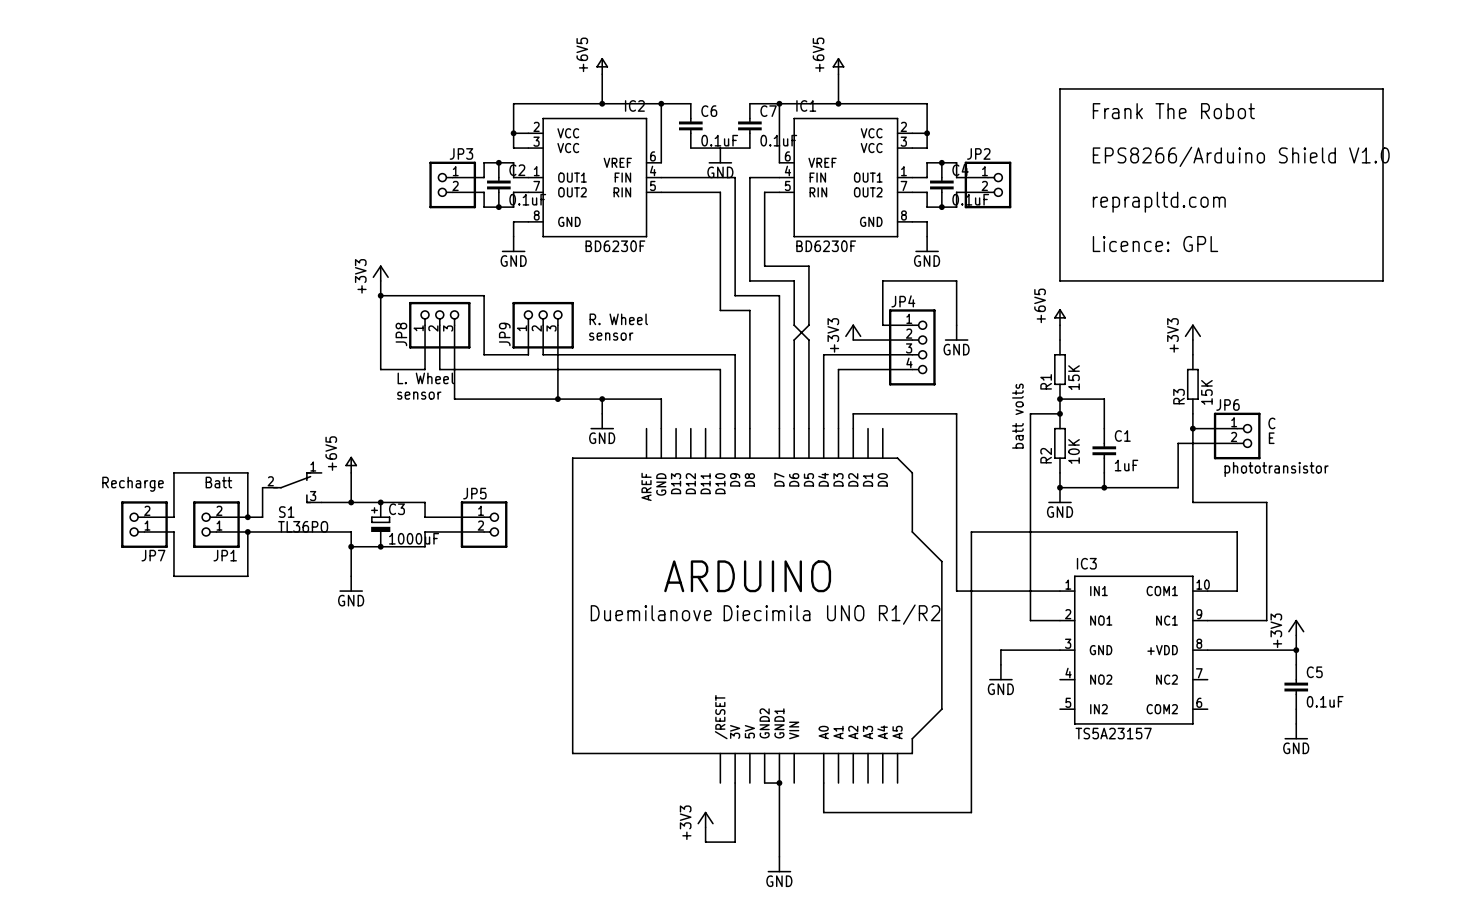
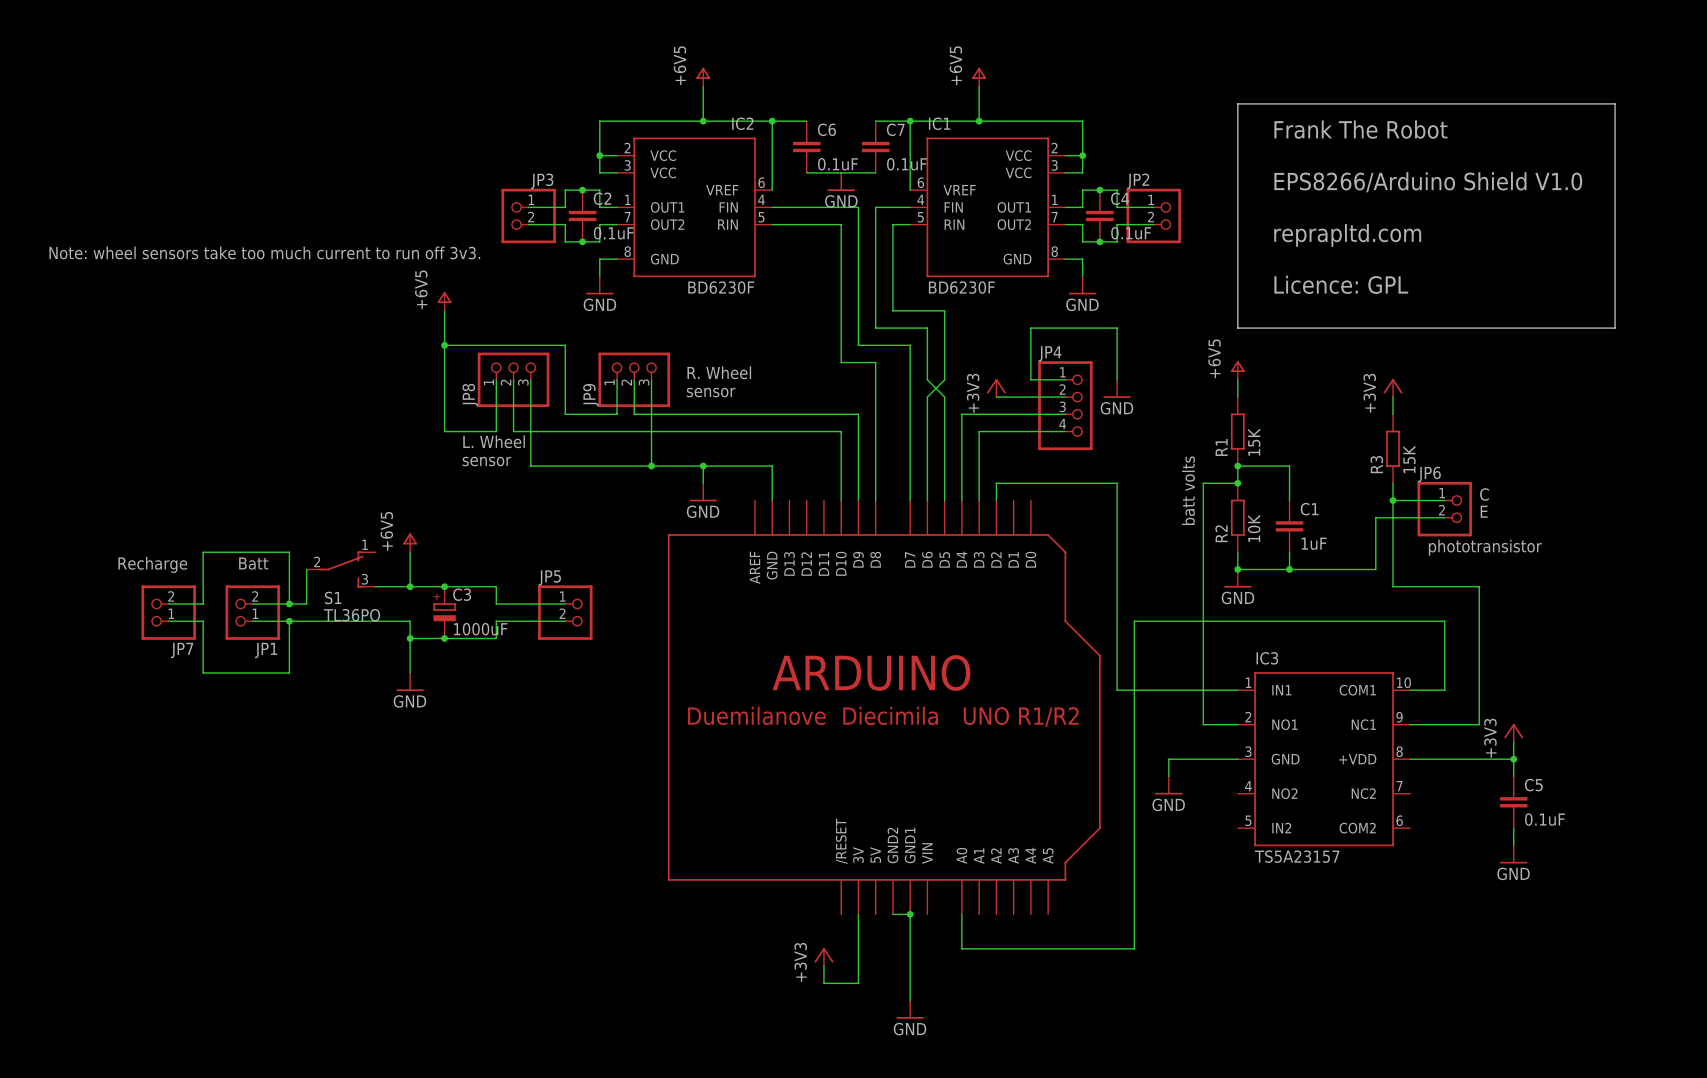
text: none -> Note: wheel sensors take too much current to run off 3v3. (264, 252)
power symbol: none -> +6V5 (444, 301)
power symbol: +3V3 (380, 273) -> none

